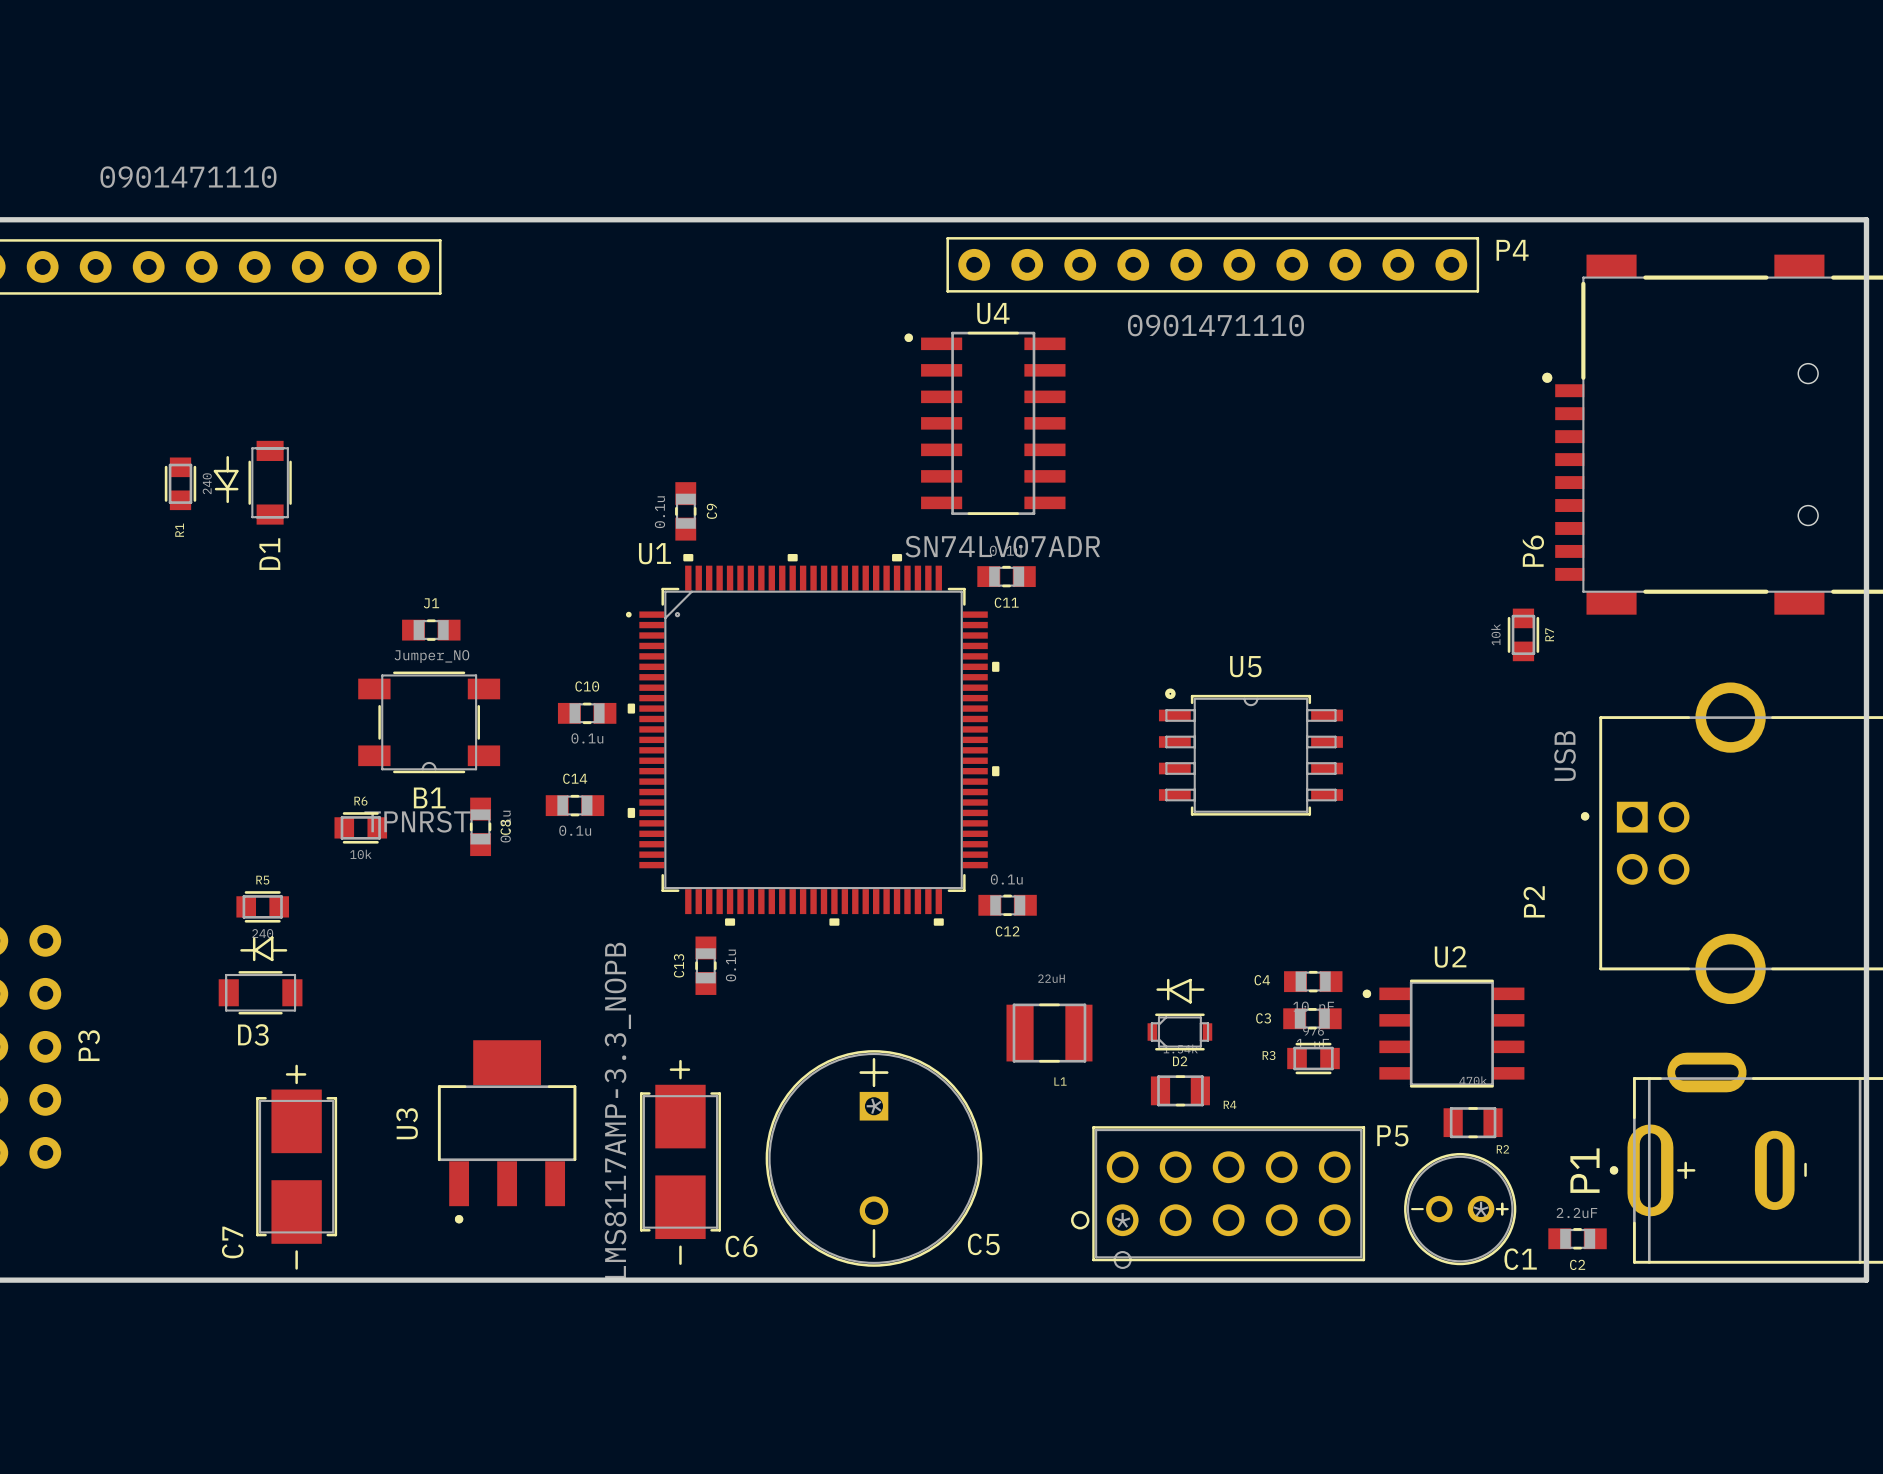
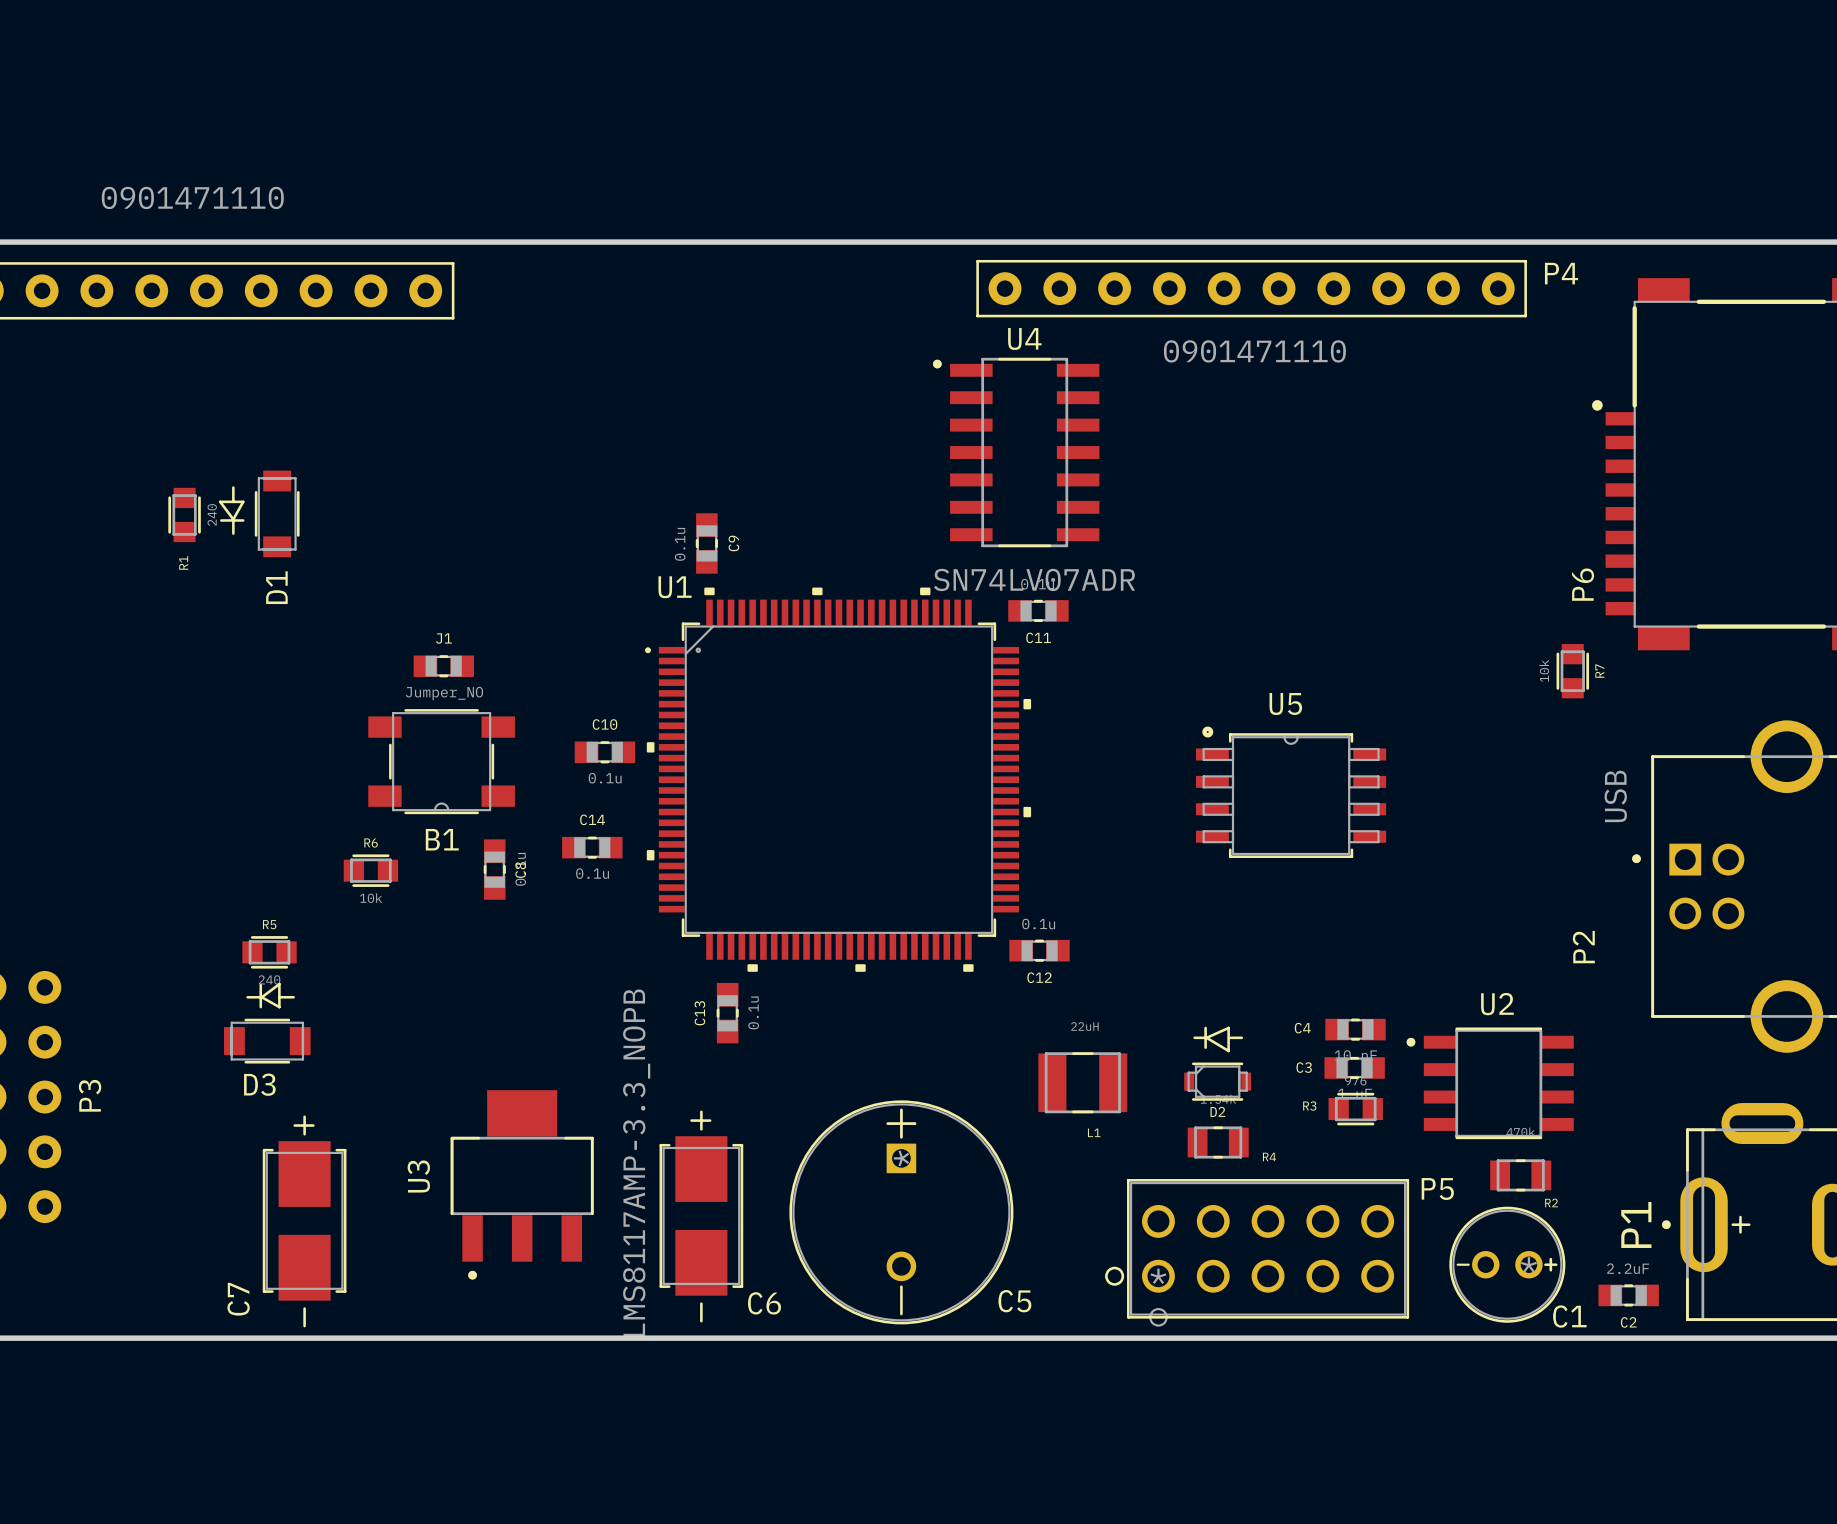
part: TPNRST (417, 821) -> none

